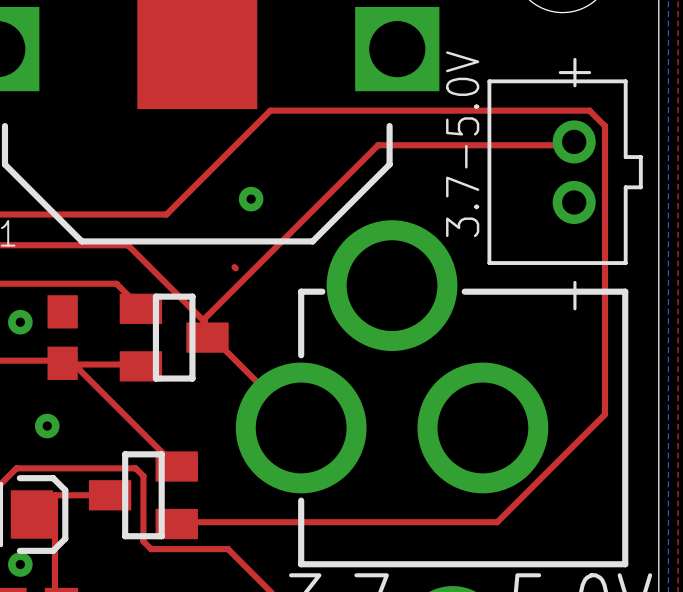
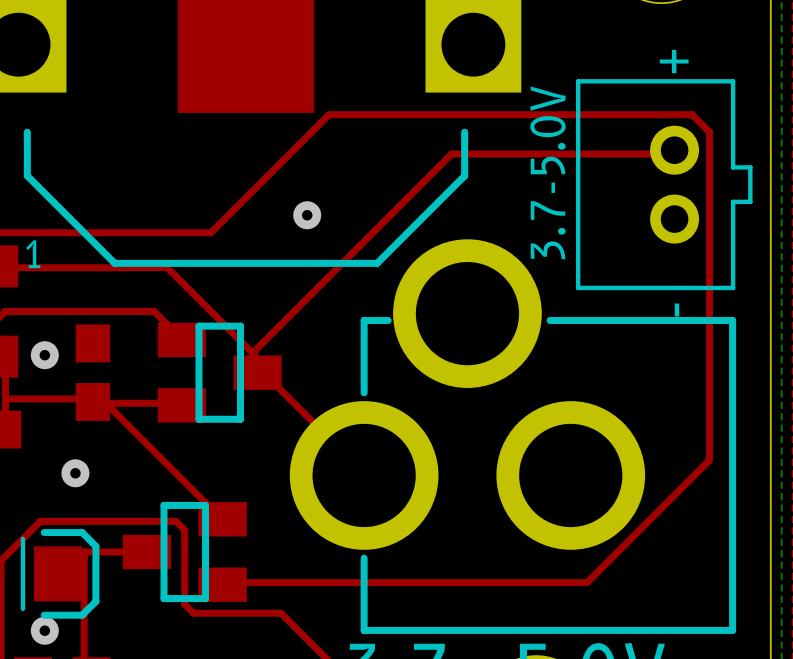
top track: (234, 267) (235, 268) -> none

